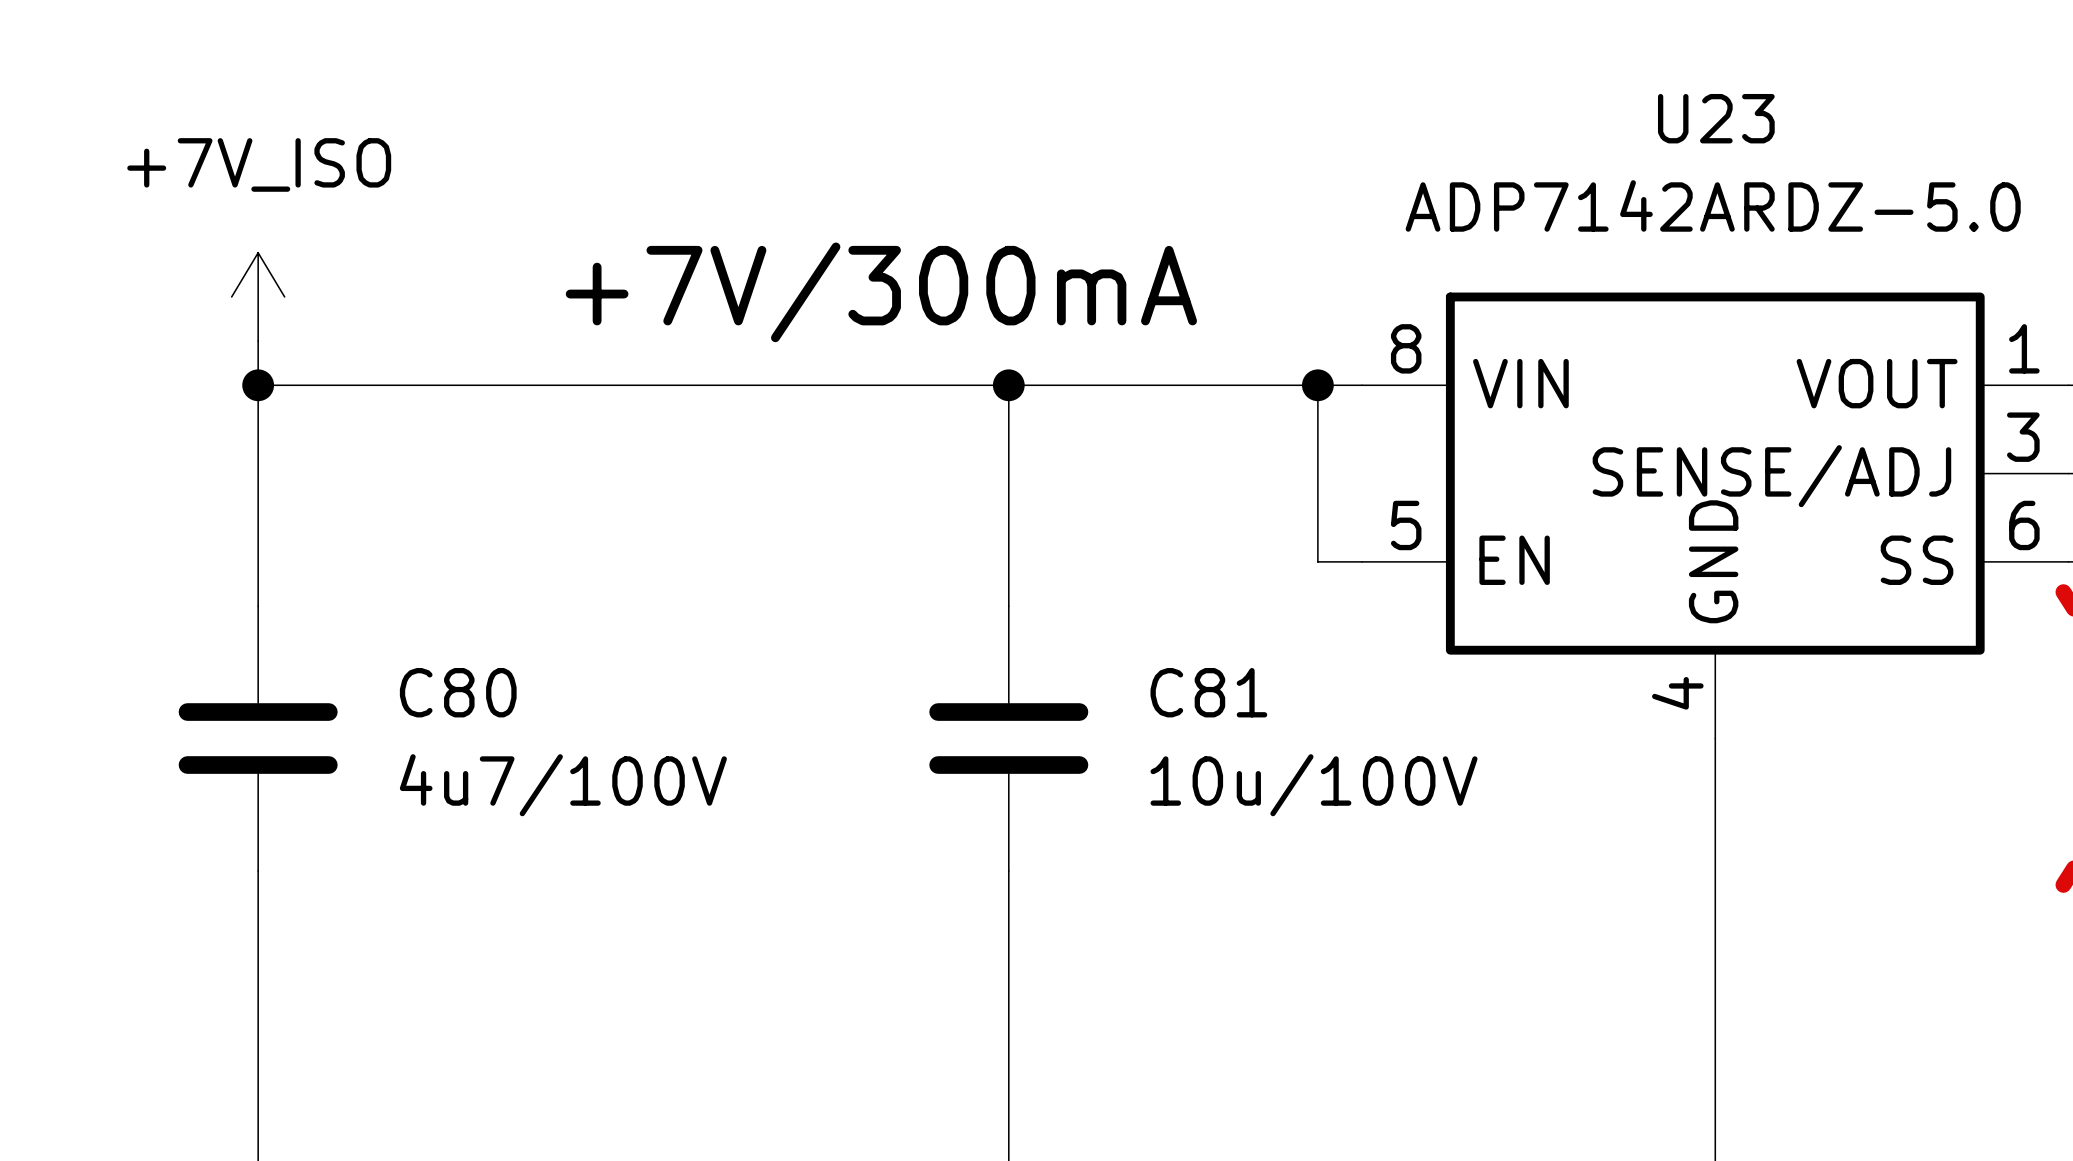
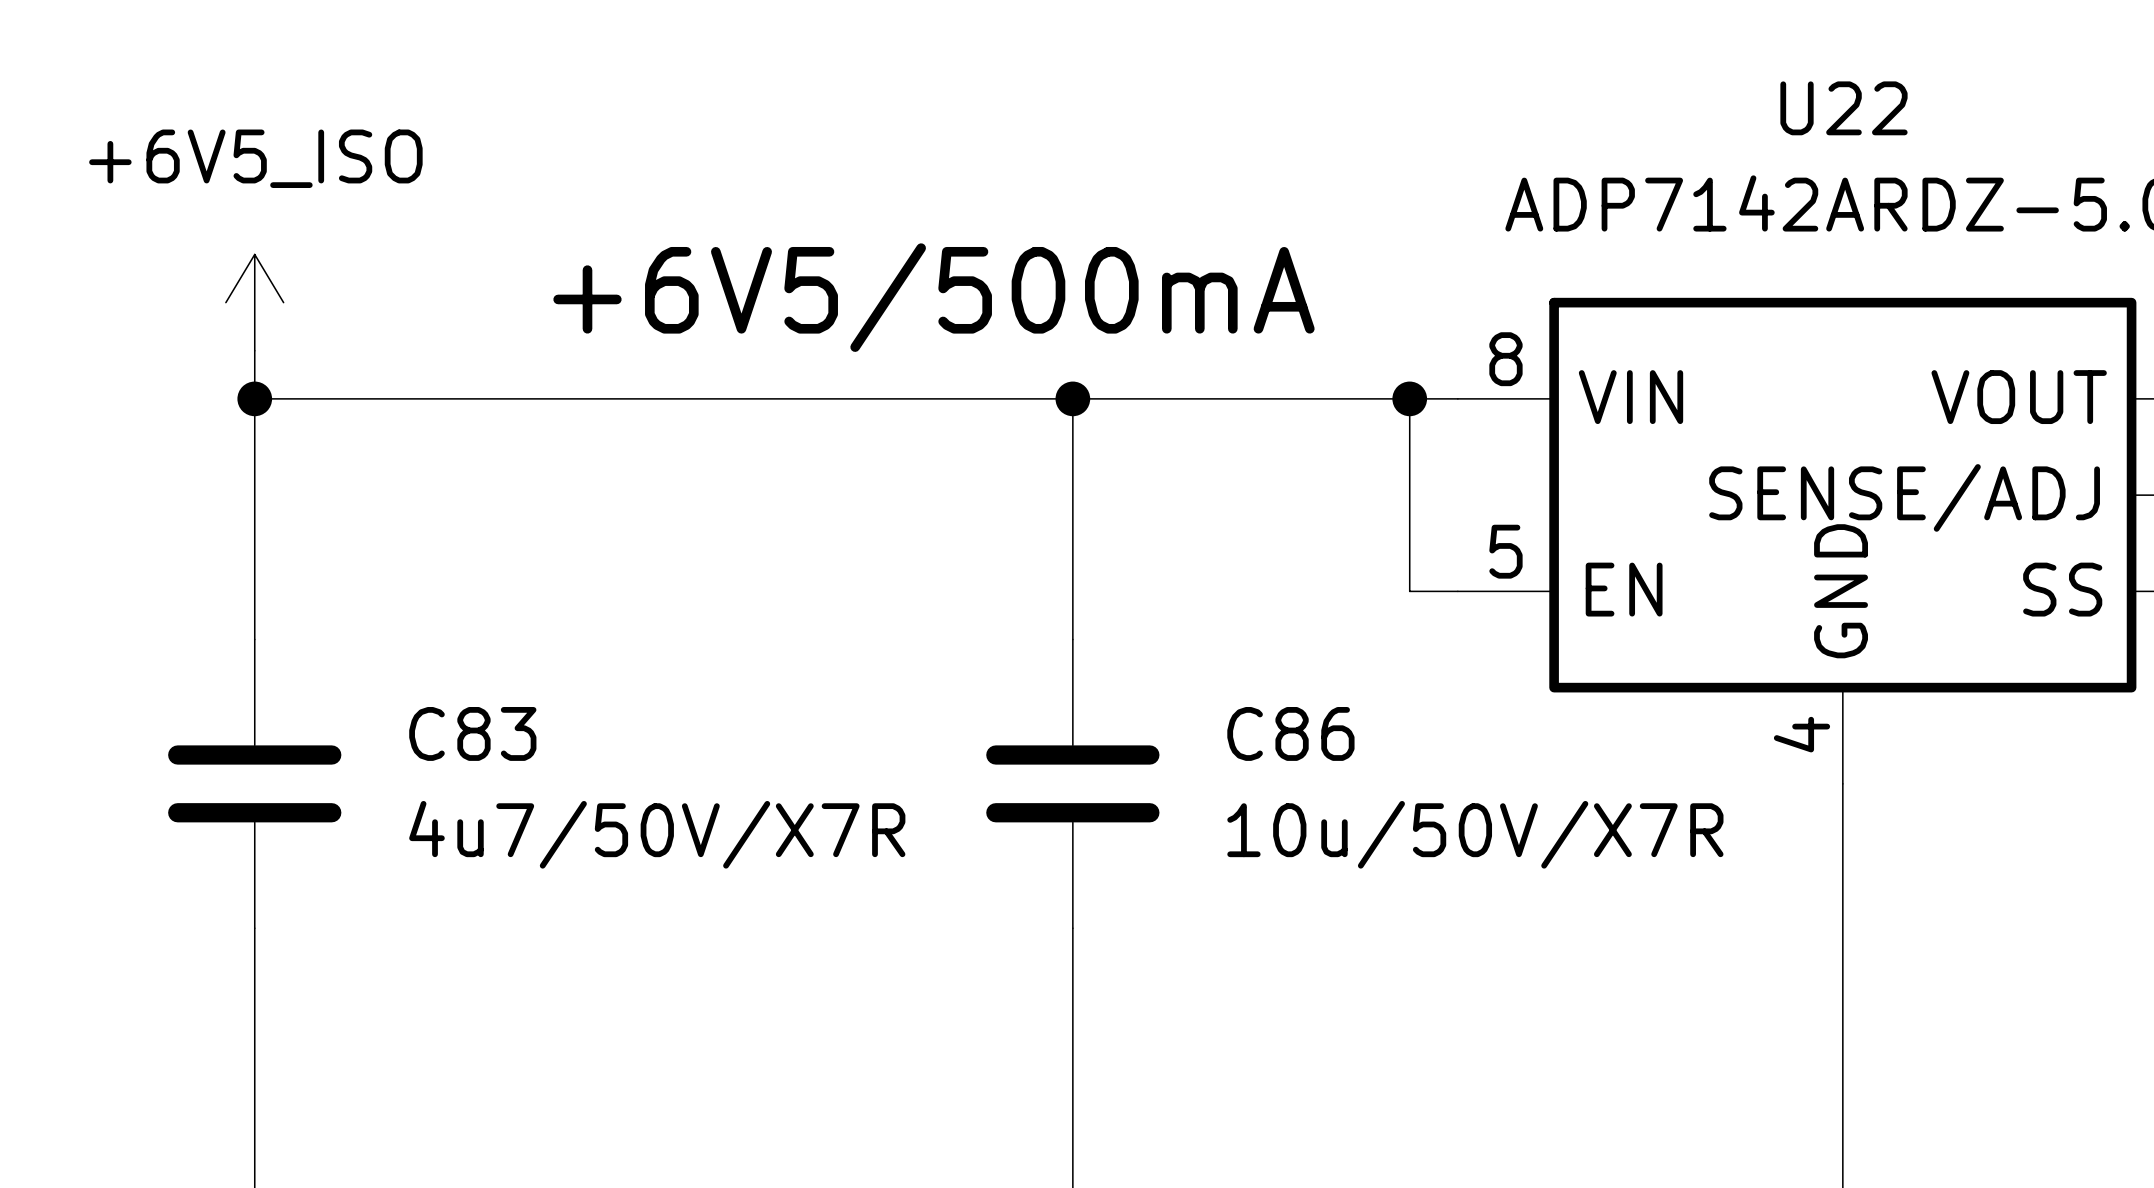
U23 name: U23 (1716, 118) -> U22 (1843, 108)
text: +7V/300mA (881, 292) -> +6V5/500mA (933, 297)
power symbol: +7V_ISO (258, 296) -> +6V5_ISO (254, 302)
C80 name: C80 (458, 692) -> C83 (472, 733)
C81 name: C81 (1208, 692) -> C86 (1290, 733)
C80 value: 4u7/100V (563, 785) -> 4u7/50V/X7R (657, 834)
C81 value: 10u/100V (1314, 785) -> 10u/50V/X7R (1475, 834)

